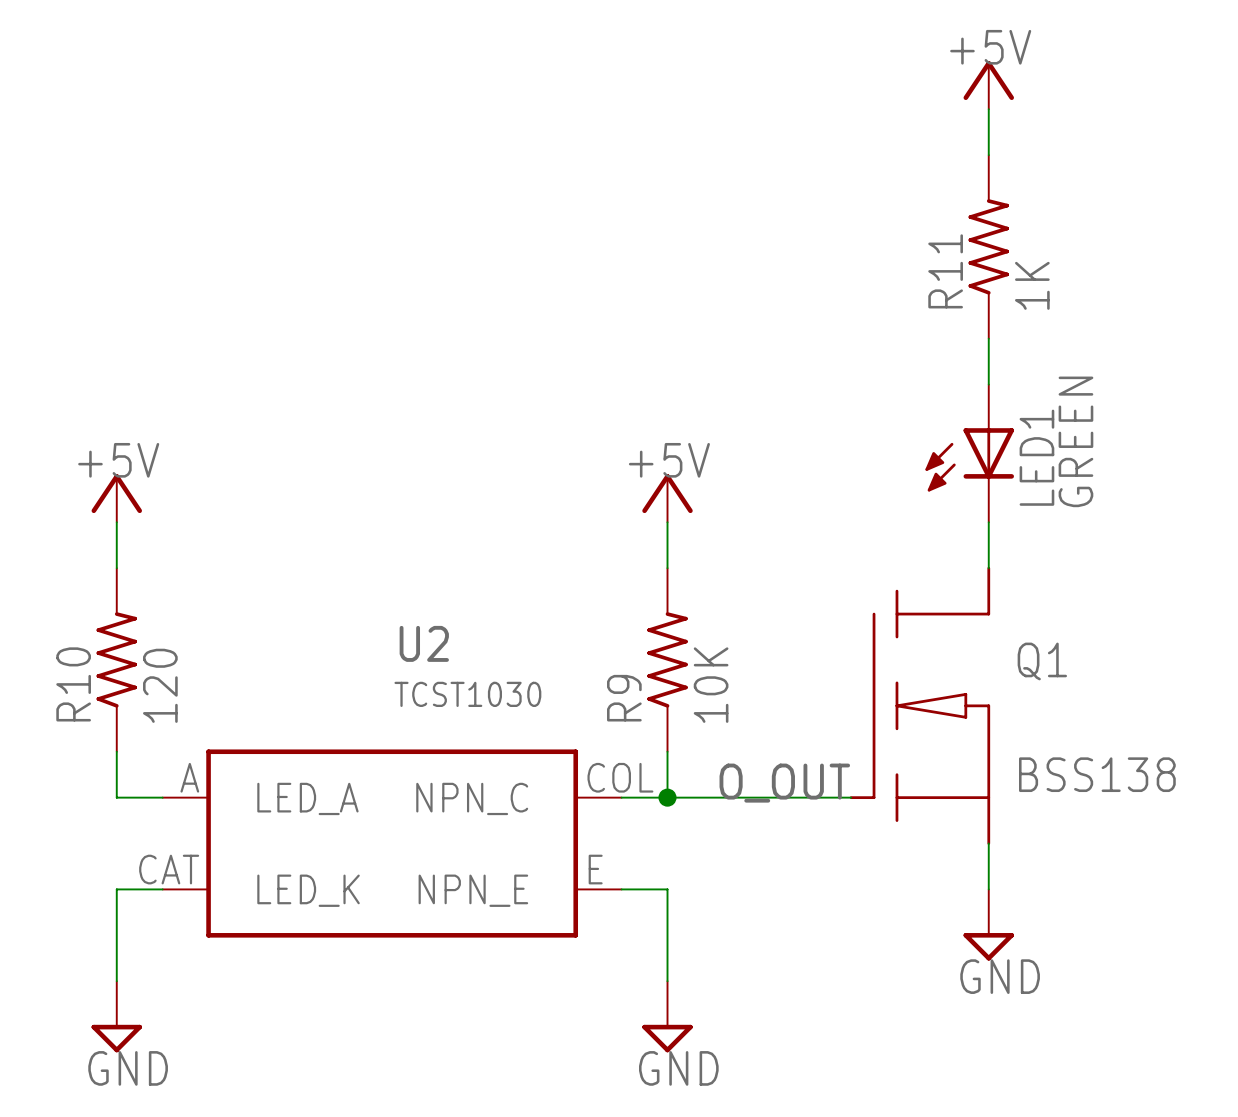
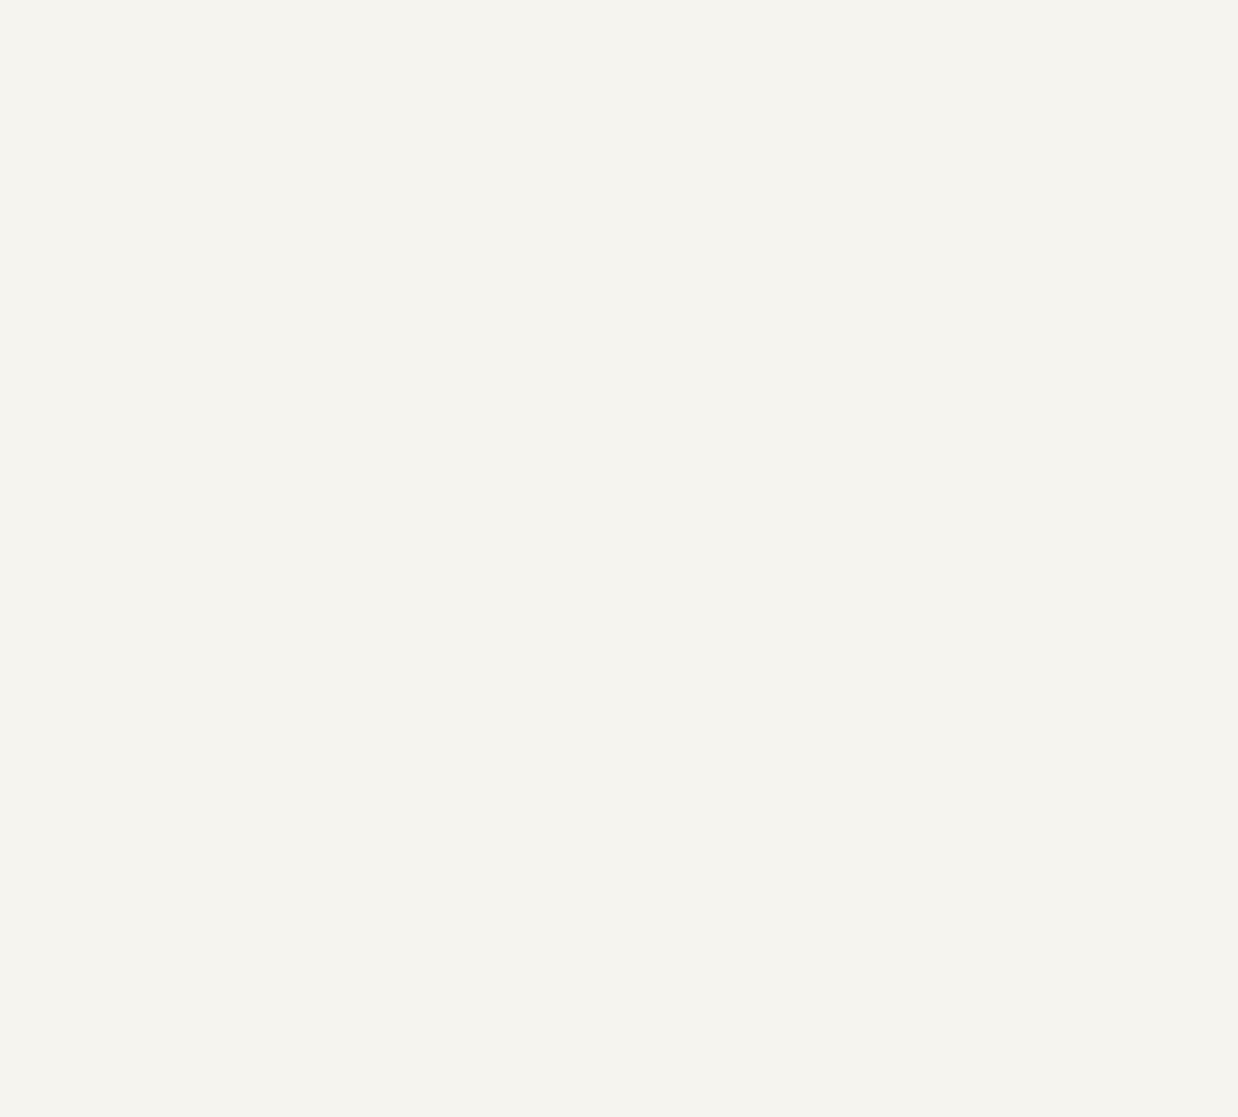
power symbol: +5V (988, 85) -> none
wire: (988, 109) (988, 155) -> none
R11: 1K (988, 246) -> none
wire: (988, 338) (988, 384) -> none
LED1: GREEN (969, 453) -> none
power symbol: +5V (116, 498) -> none
power symbol: +5V (667, 498) -> none
wire: (116, 522) (116, 568) -> none
wire: (667, 522) (667, 568) -> none
wire: (988, 522) (988, 568) -> none
R10: 120 (116, 659) -> none
R9: 10K (667, 659) -> none
Q1: BSS138 (919, 705) -> none
wire: (116, 751) (116, 797) (162, 797) -> none
wire: (667, 751) (667, 797) -> none
label: O_OUT (784, 783) -> none
wire: (621, 797) (851, 797) -> none
junction: (667, 797) -> none
U2: TCST1030 (392, 843) -> none
wire: (988, 843) (988, 889) -> none
wire: (162, 889) (116, 889) (116, 981) -> none
wire: (621, 889) (667, 889) (667, 981) -> none
power symbol: GND (988, 924) -> none
power symbol: GND (116, 1016) -> none
power symbol: GND (667, 1016) -> none

